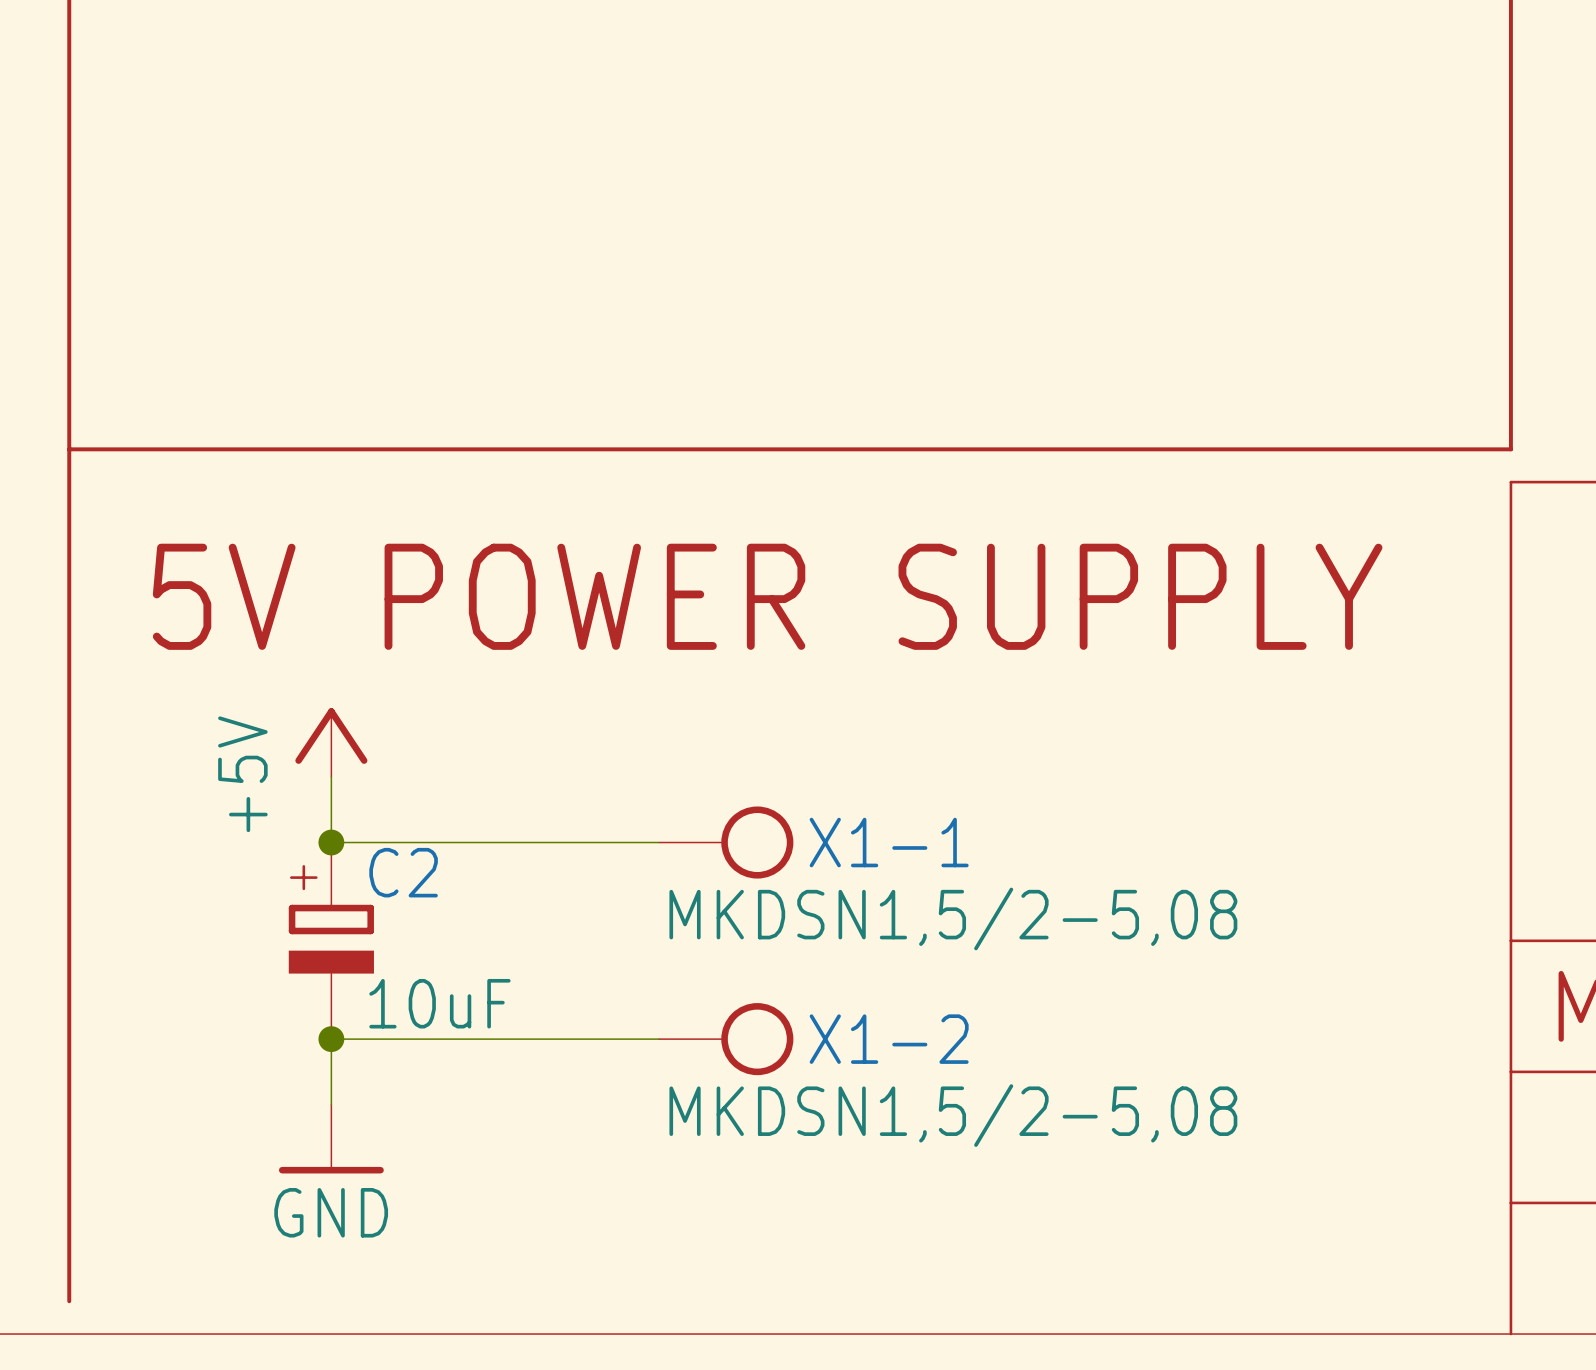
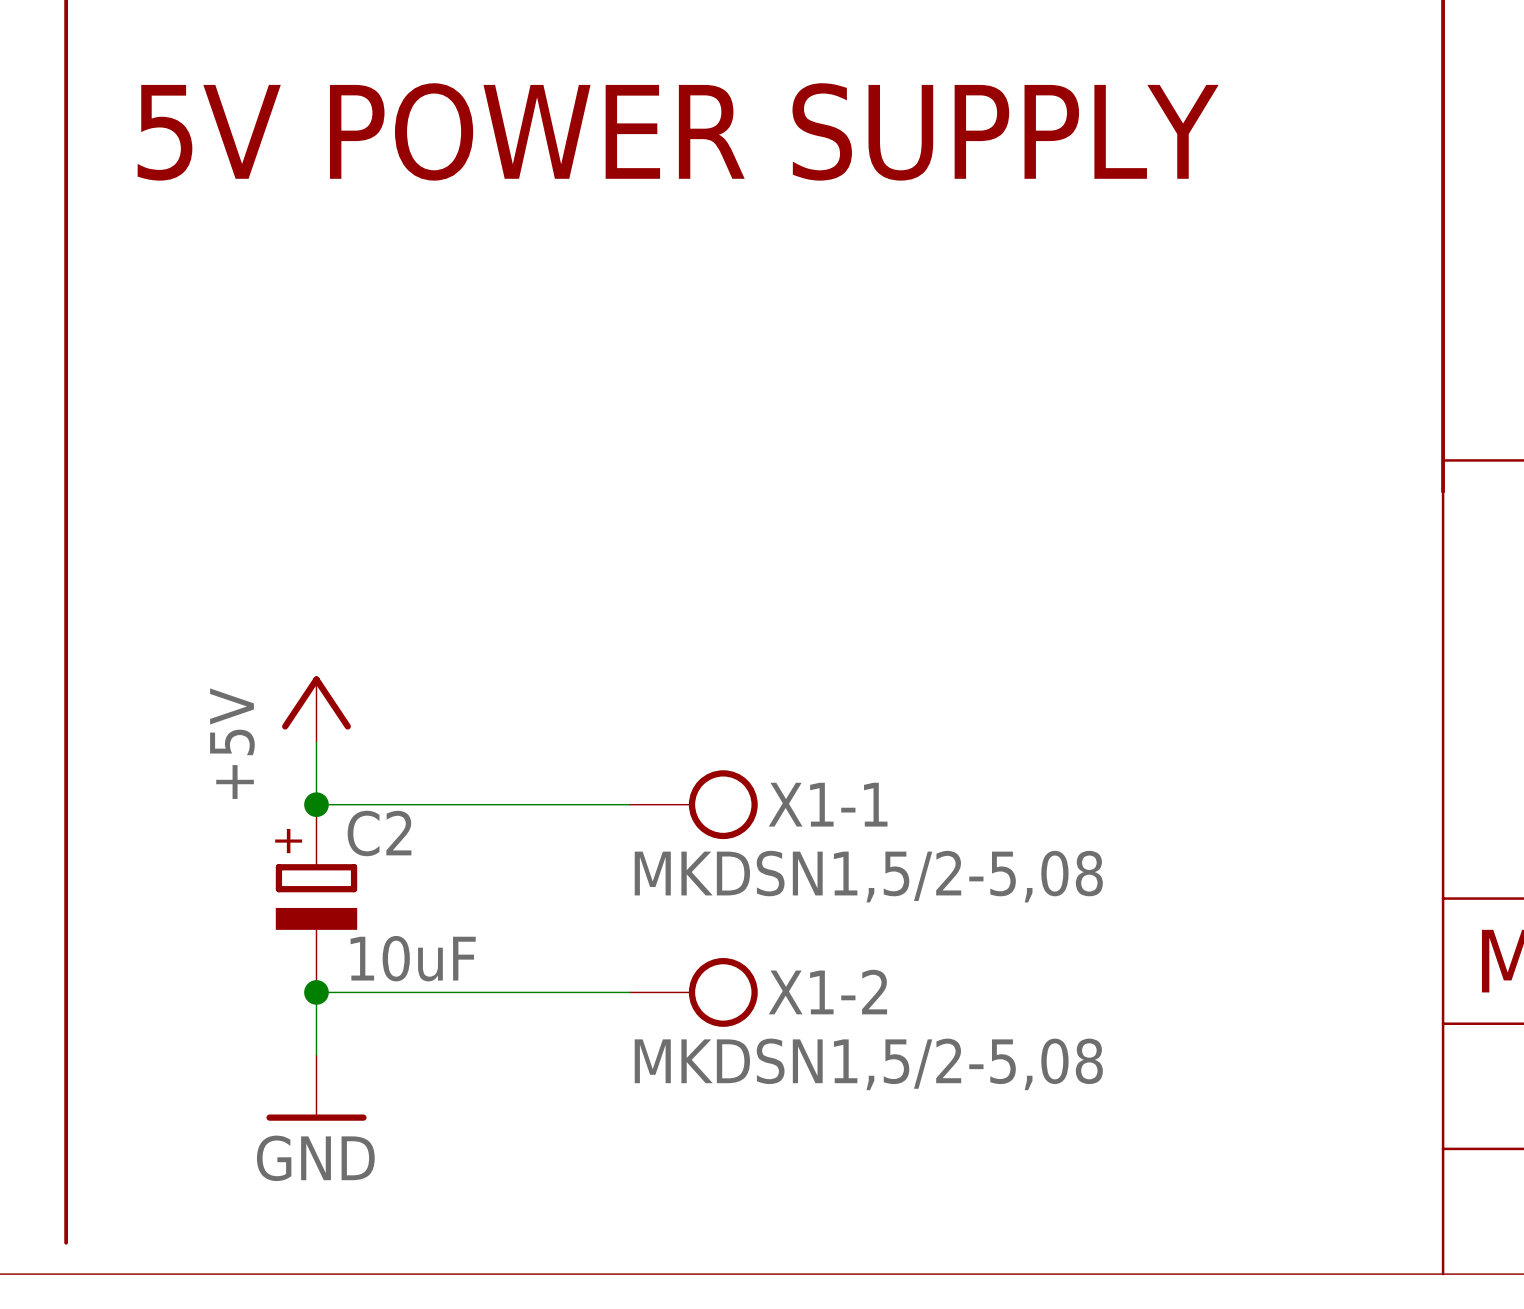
line: (69, 449) (1510, 449) -> (1443, 491) (1443, 429)
text position: 5V POWER SUPPLY (767, 596) -> 5V POWER SUPPLY (678, 131)

